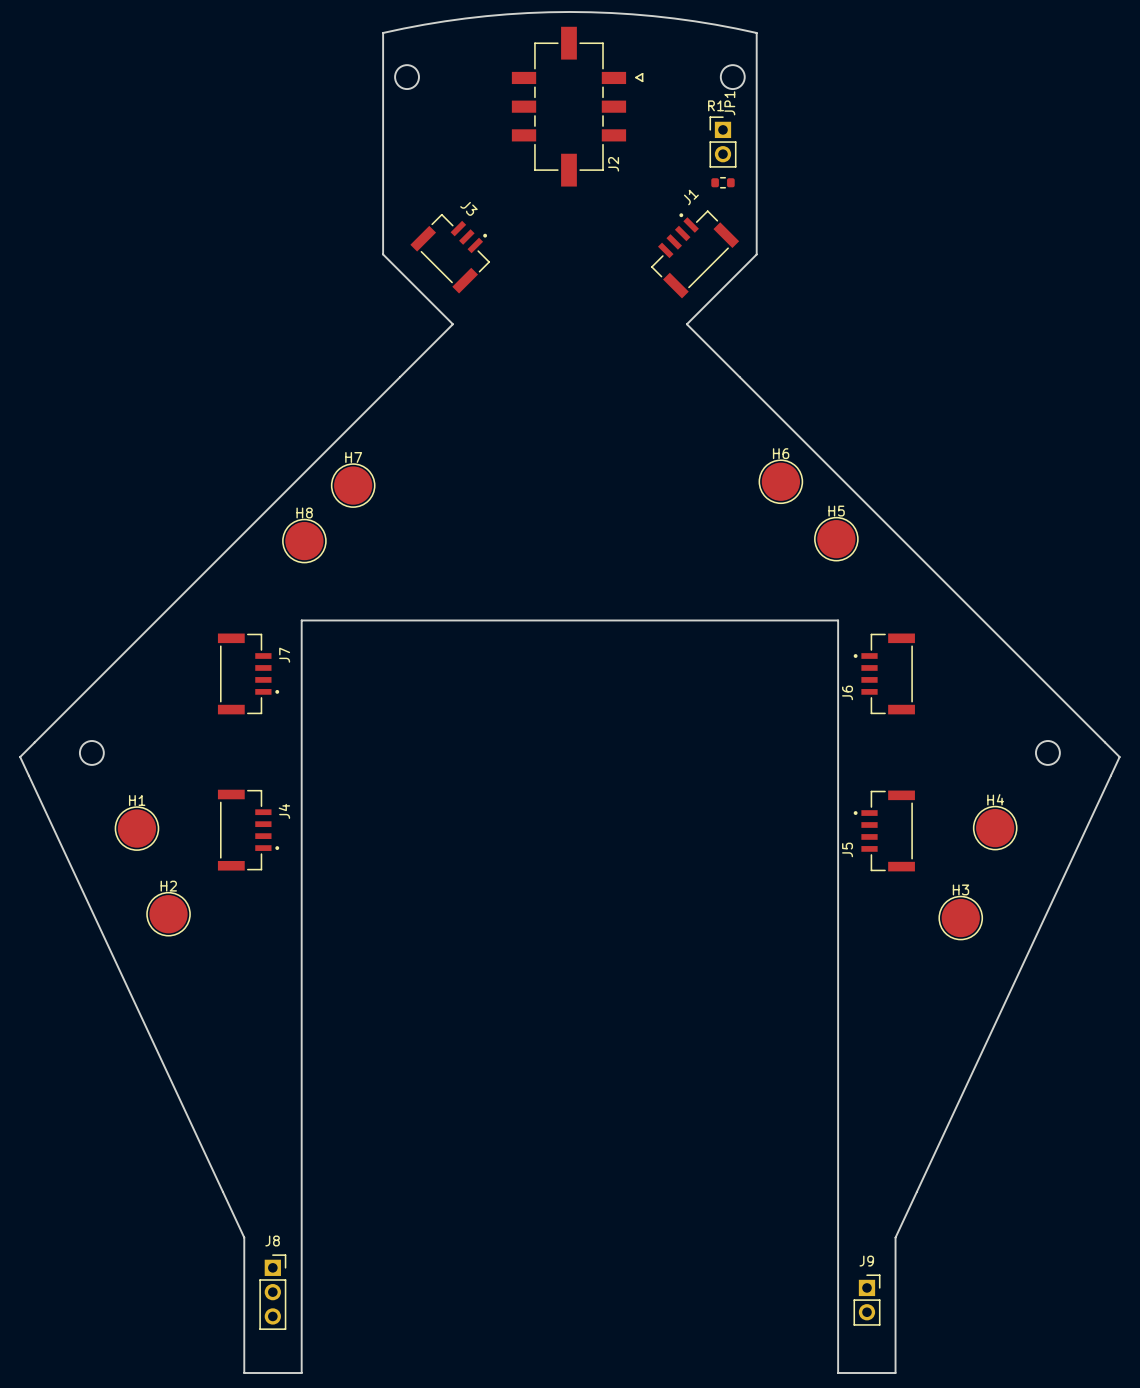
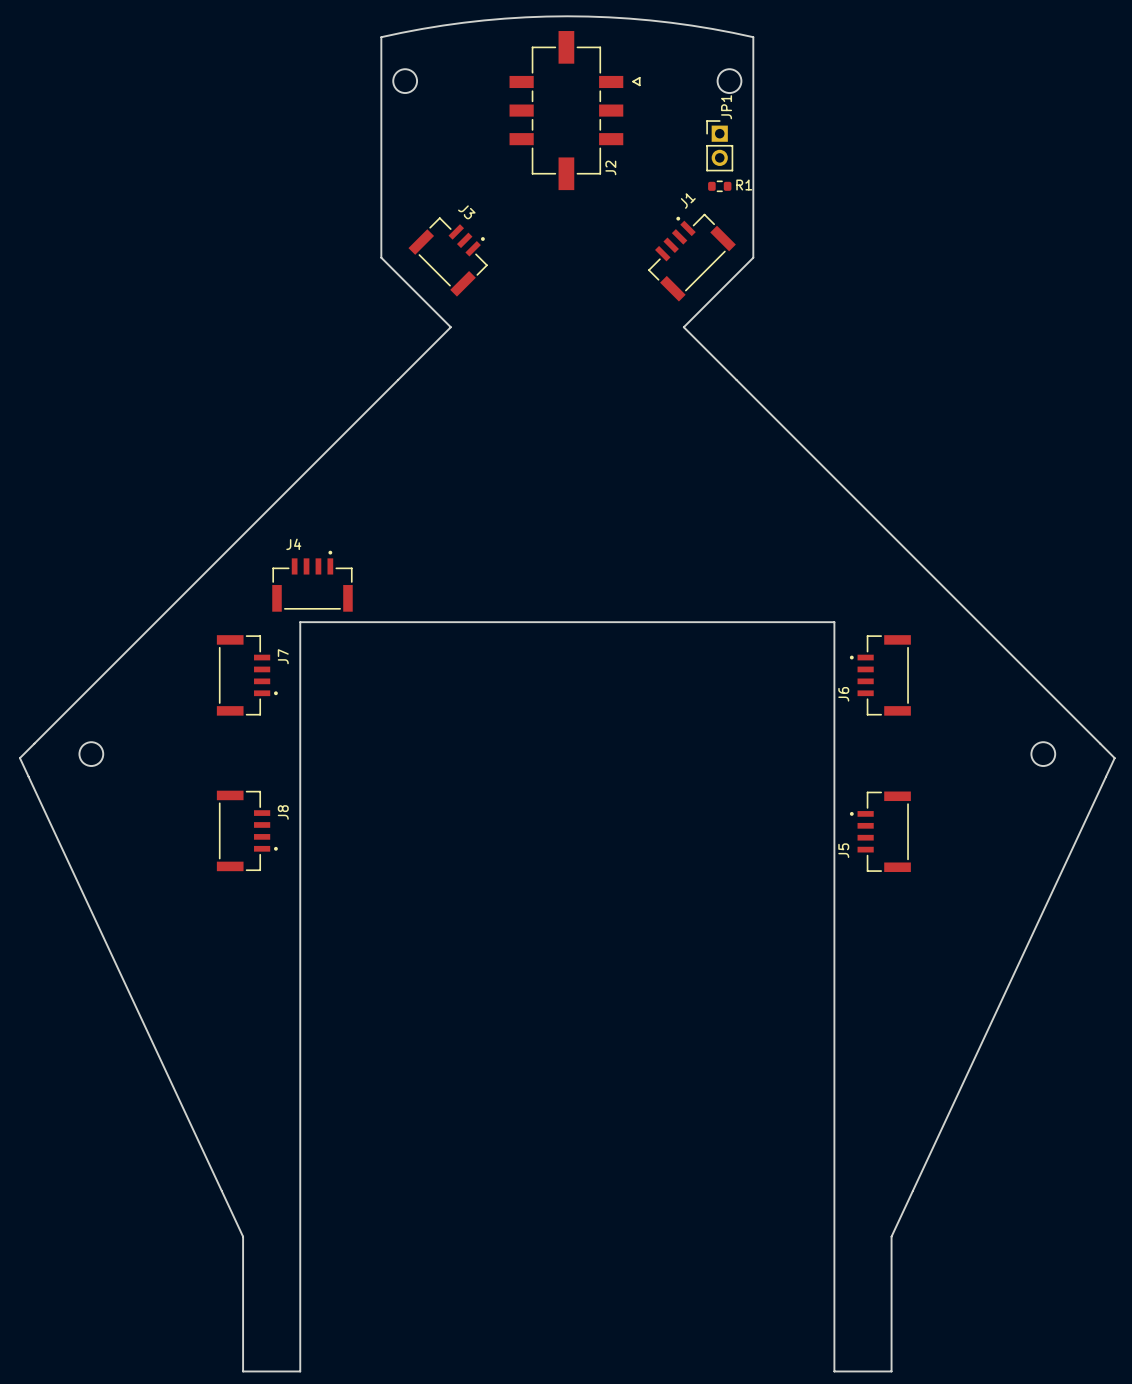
R1 name position: R1 (716, 105) -> R1 (744, 185)
H6: (780, 481) -> none
H7: (353, 485) -> none
H5: (836, 539) -> none
H8: (304, 541) -> none
J4: none -> (312, 581)
J4 name: J4 (284, 811) -> J8 (283, 812)
H1: (136, 828) -> none
H4: (995, 828) -> none
H2: (168, 914) -> none
H3: (960, 918) -> none
J8: (272, 1292) -> none
J9: (866, 1300) -> none

